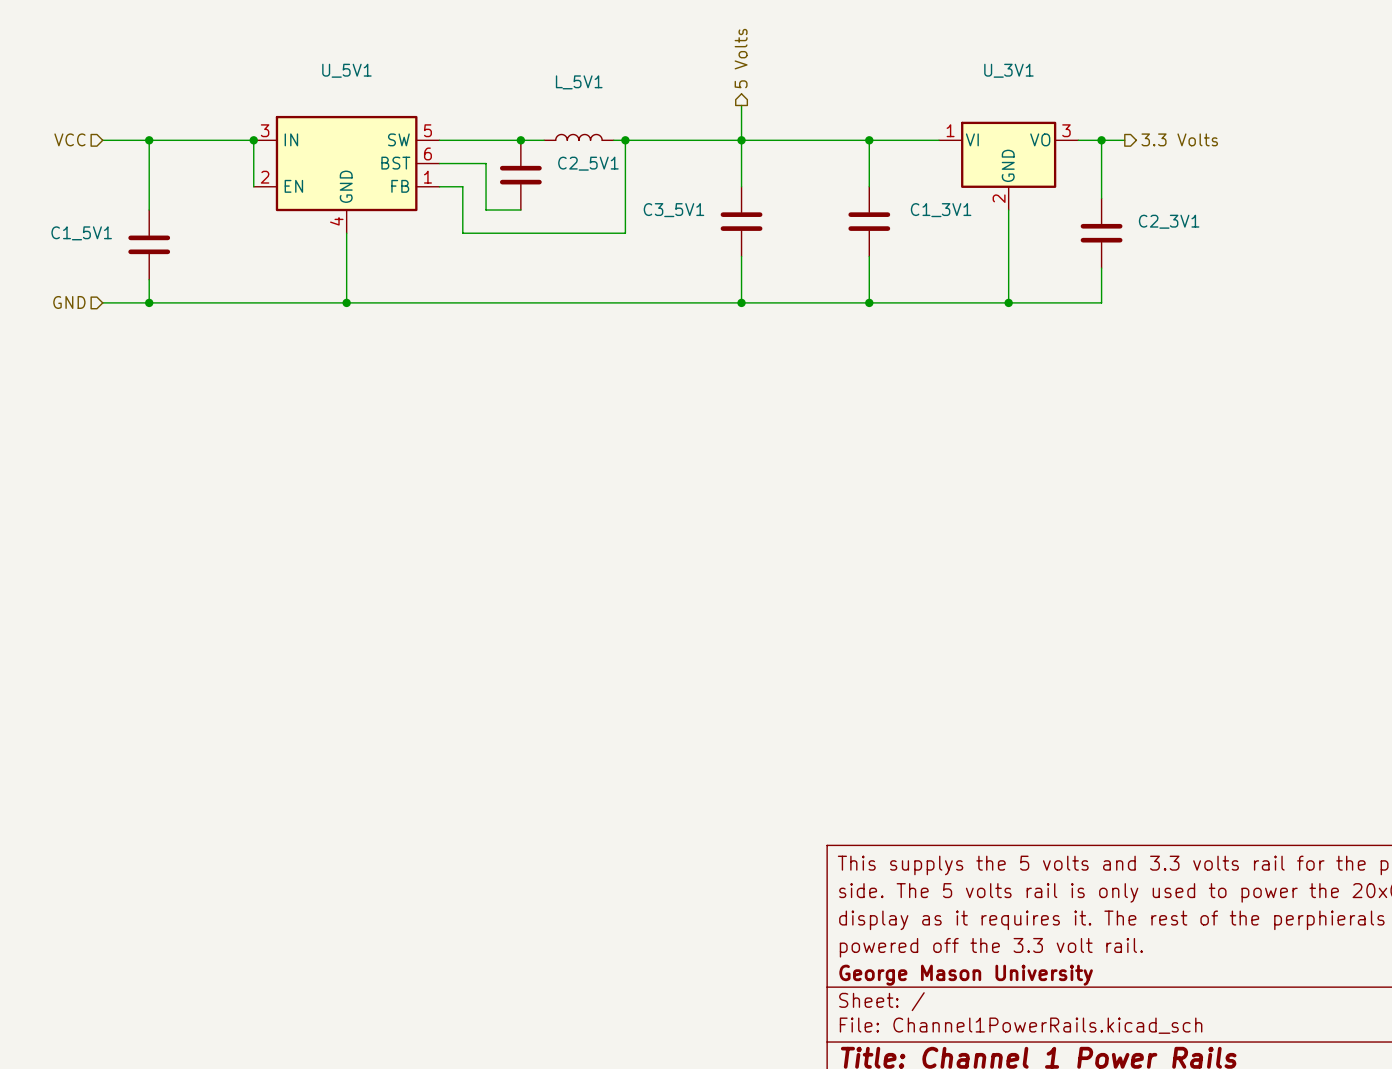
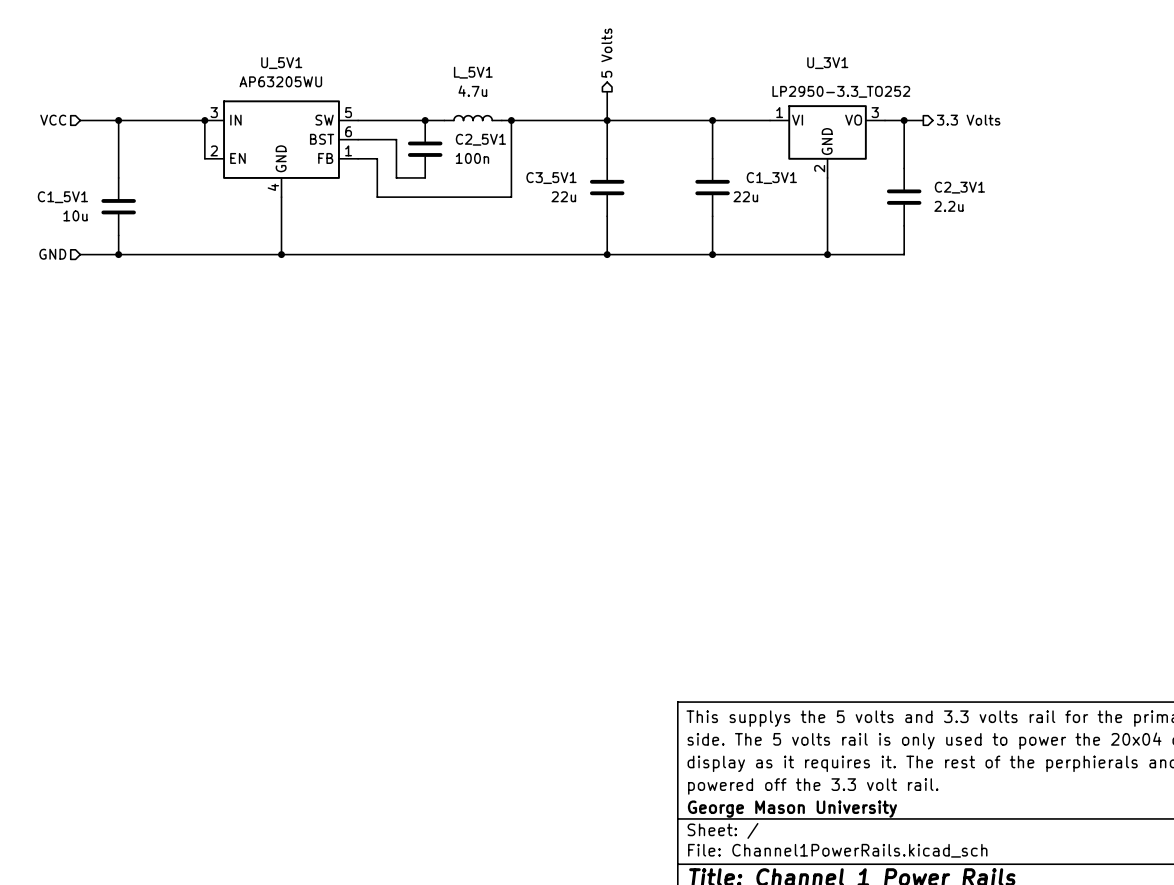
U_5V1 value: none -> AP63205WU (280, 81)
L_5V1 value: none -> 4.7u (472, 91)
U_3V1 value: none -> LP2950-3.3_TO252 (841, 91)
C2_5V1 value: none -> 100n (472, 158)
C3_5V1 value: none -> 22u (563, 196)
C1_3V1 value: none -> 22u (745, 196)
C2_3V1 value: none -> 2.2u (948, 206)
C1_5V1 value: none -> 10u (75, 215)

